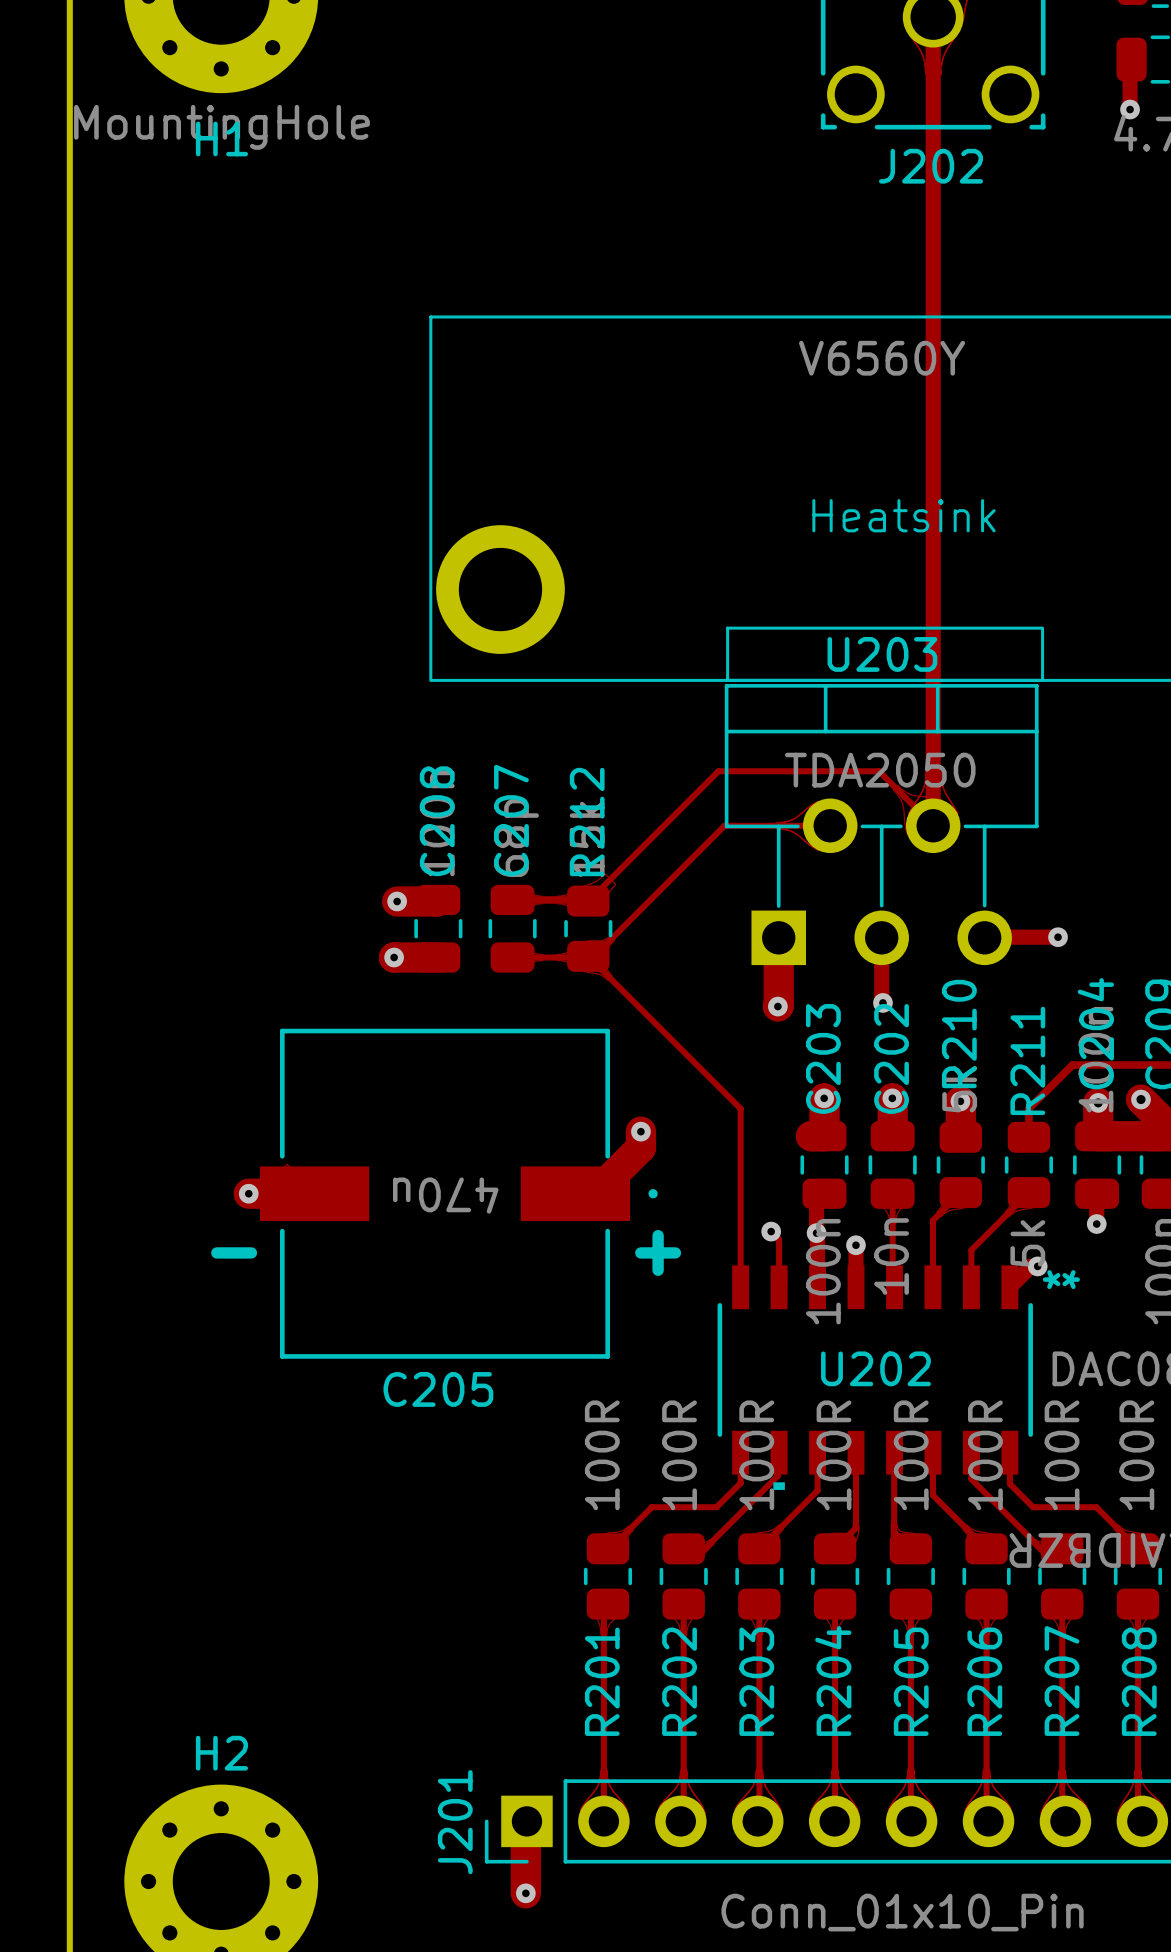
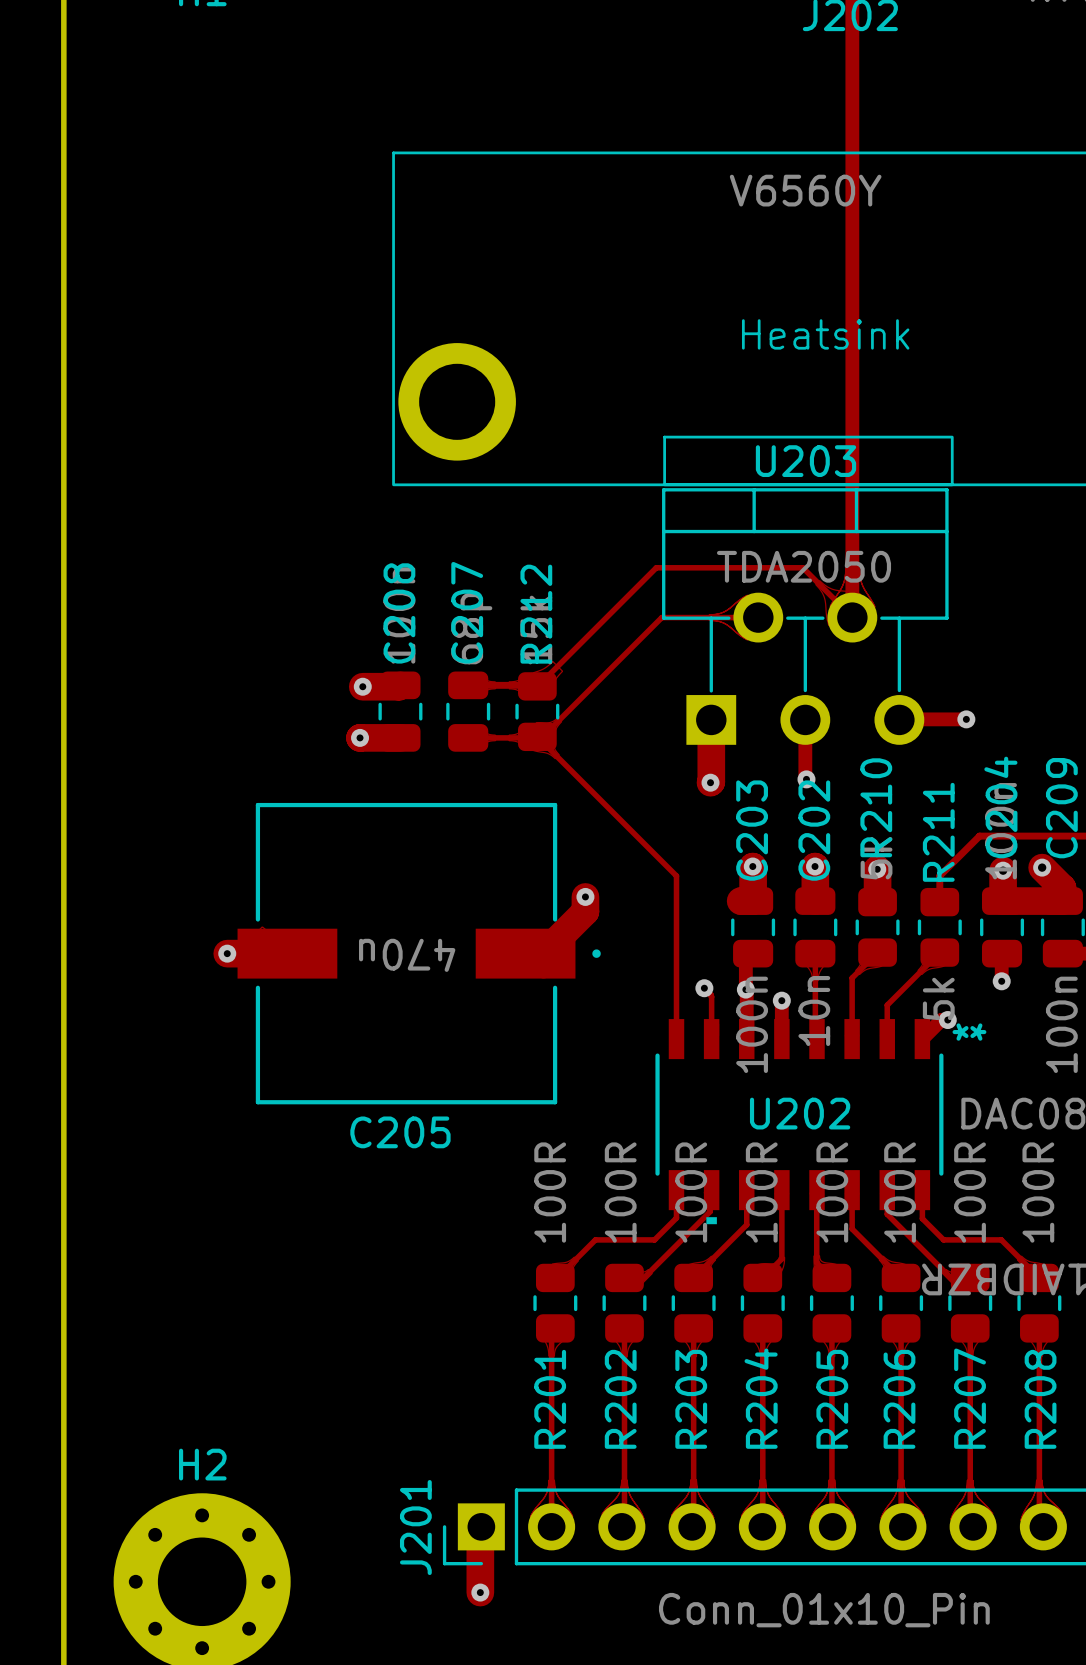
text: - (234, 1252) -> none
text: + (658, 1252) -> none

